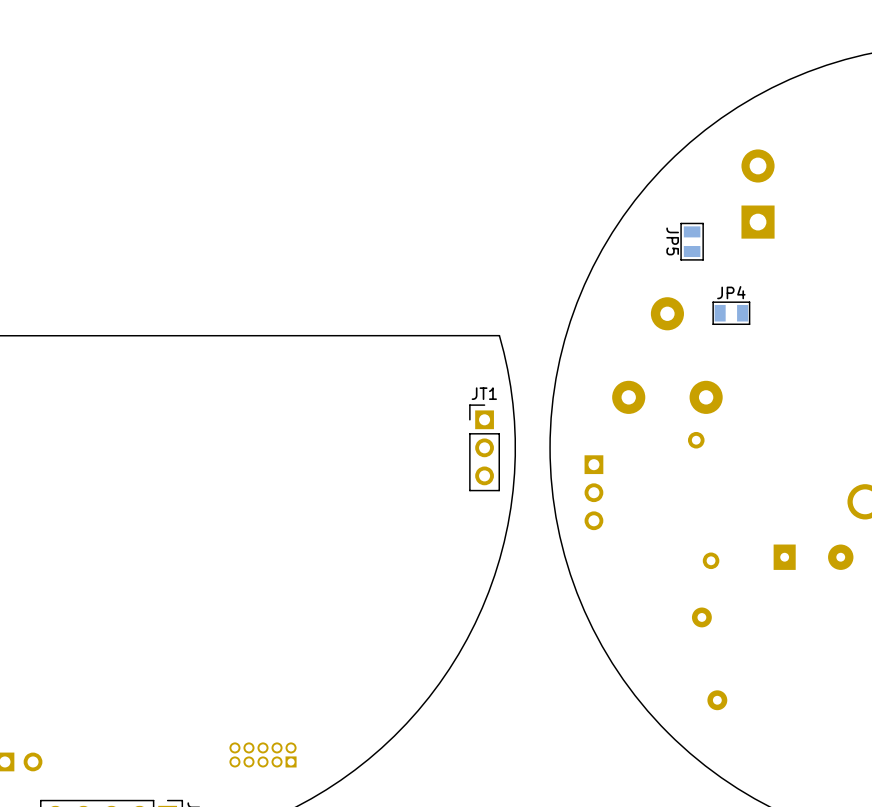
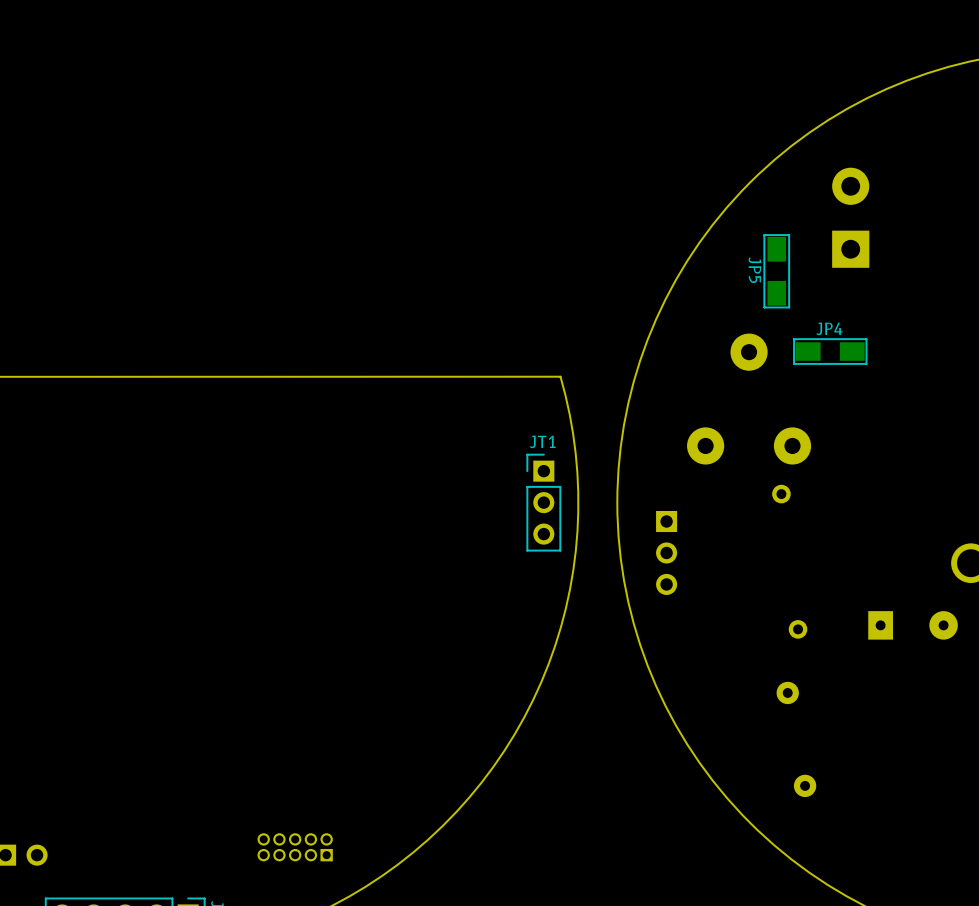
JP5 footprint: [680, 222, 704, 261] -> [763, 234, 790, 309]
JP4 footprint: [712, 301, 751, 325] -> [793, 338, 868, 365]

